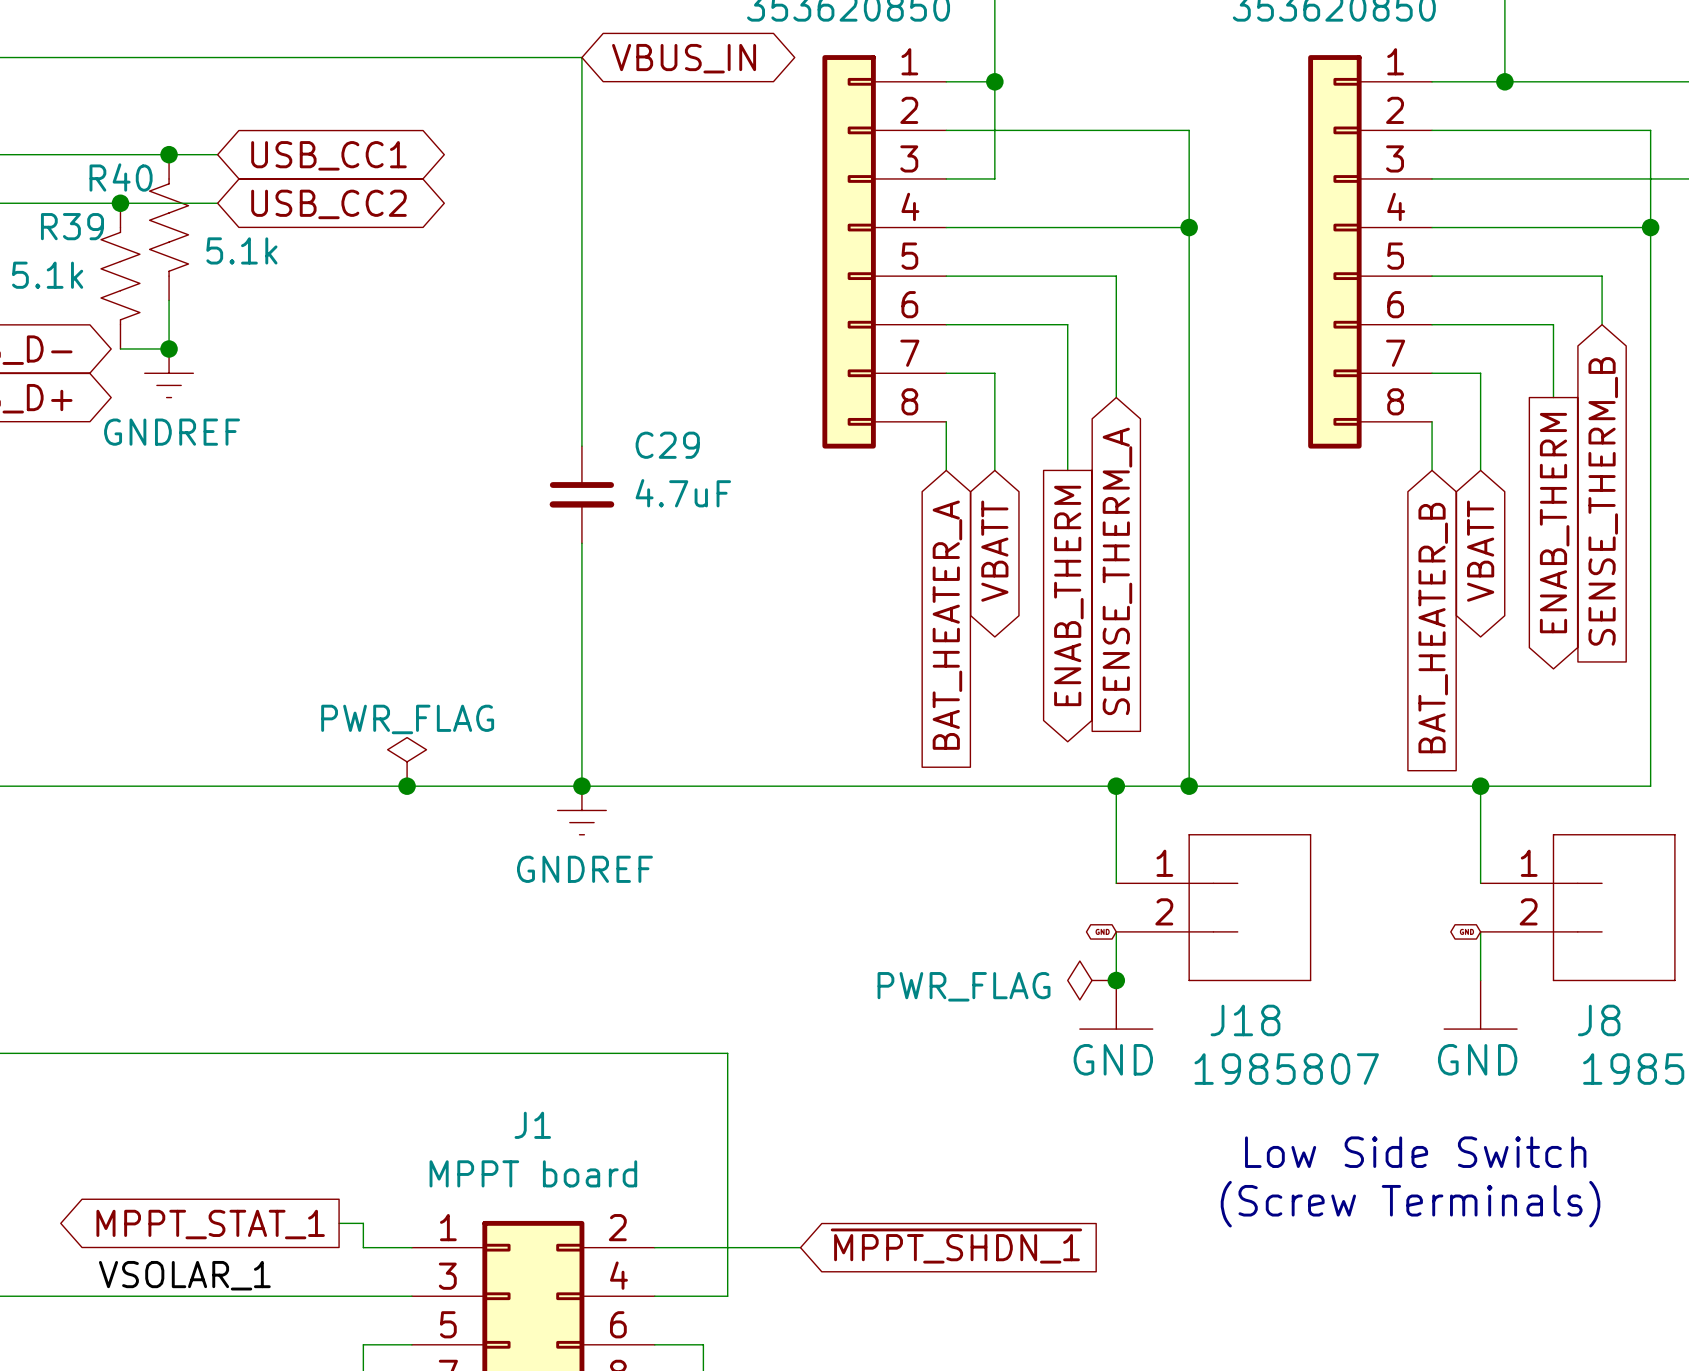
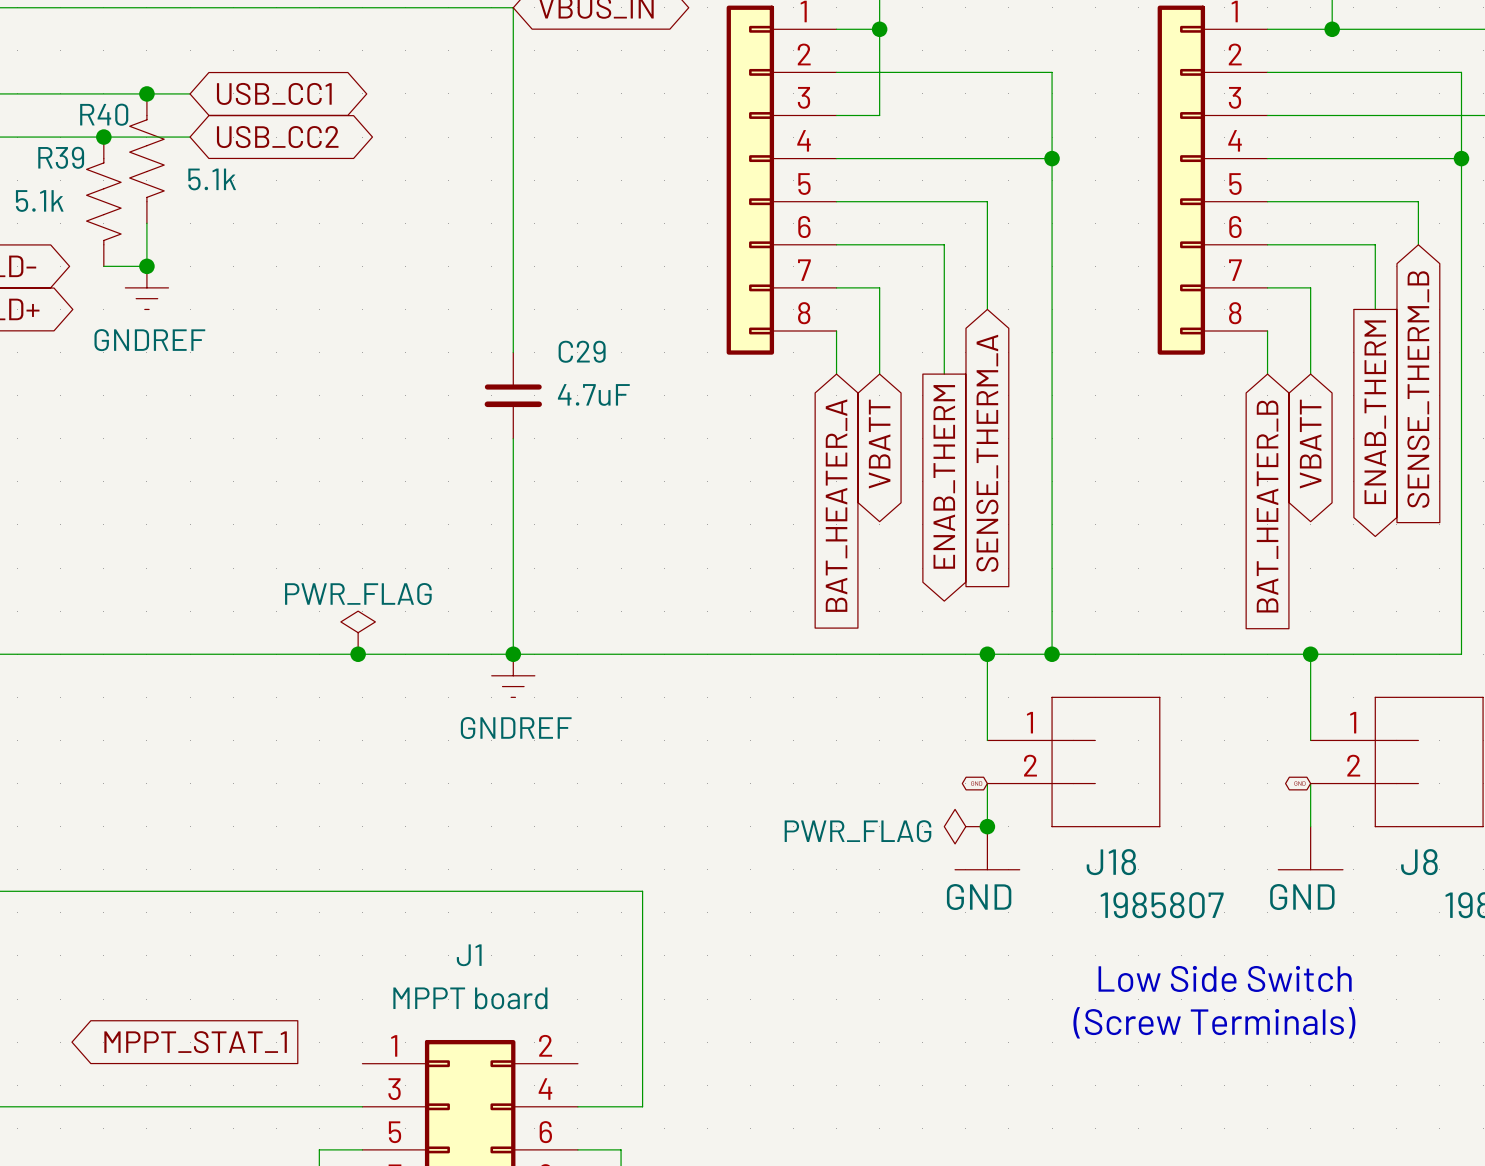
wire: (339, 1223) (363, 1223) (363, 1247) (411, 1247) -> none
global label: ~{MPPT_SHDN_1} (956, 1246) -> none
wire: (654, 1247) (800, 1247) -> none
label: VSOLAR_1 (184, 1275) -> none

